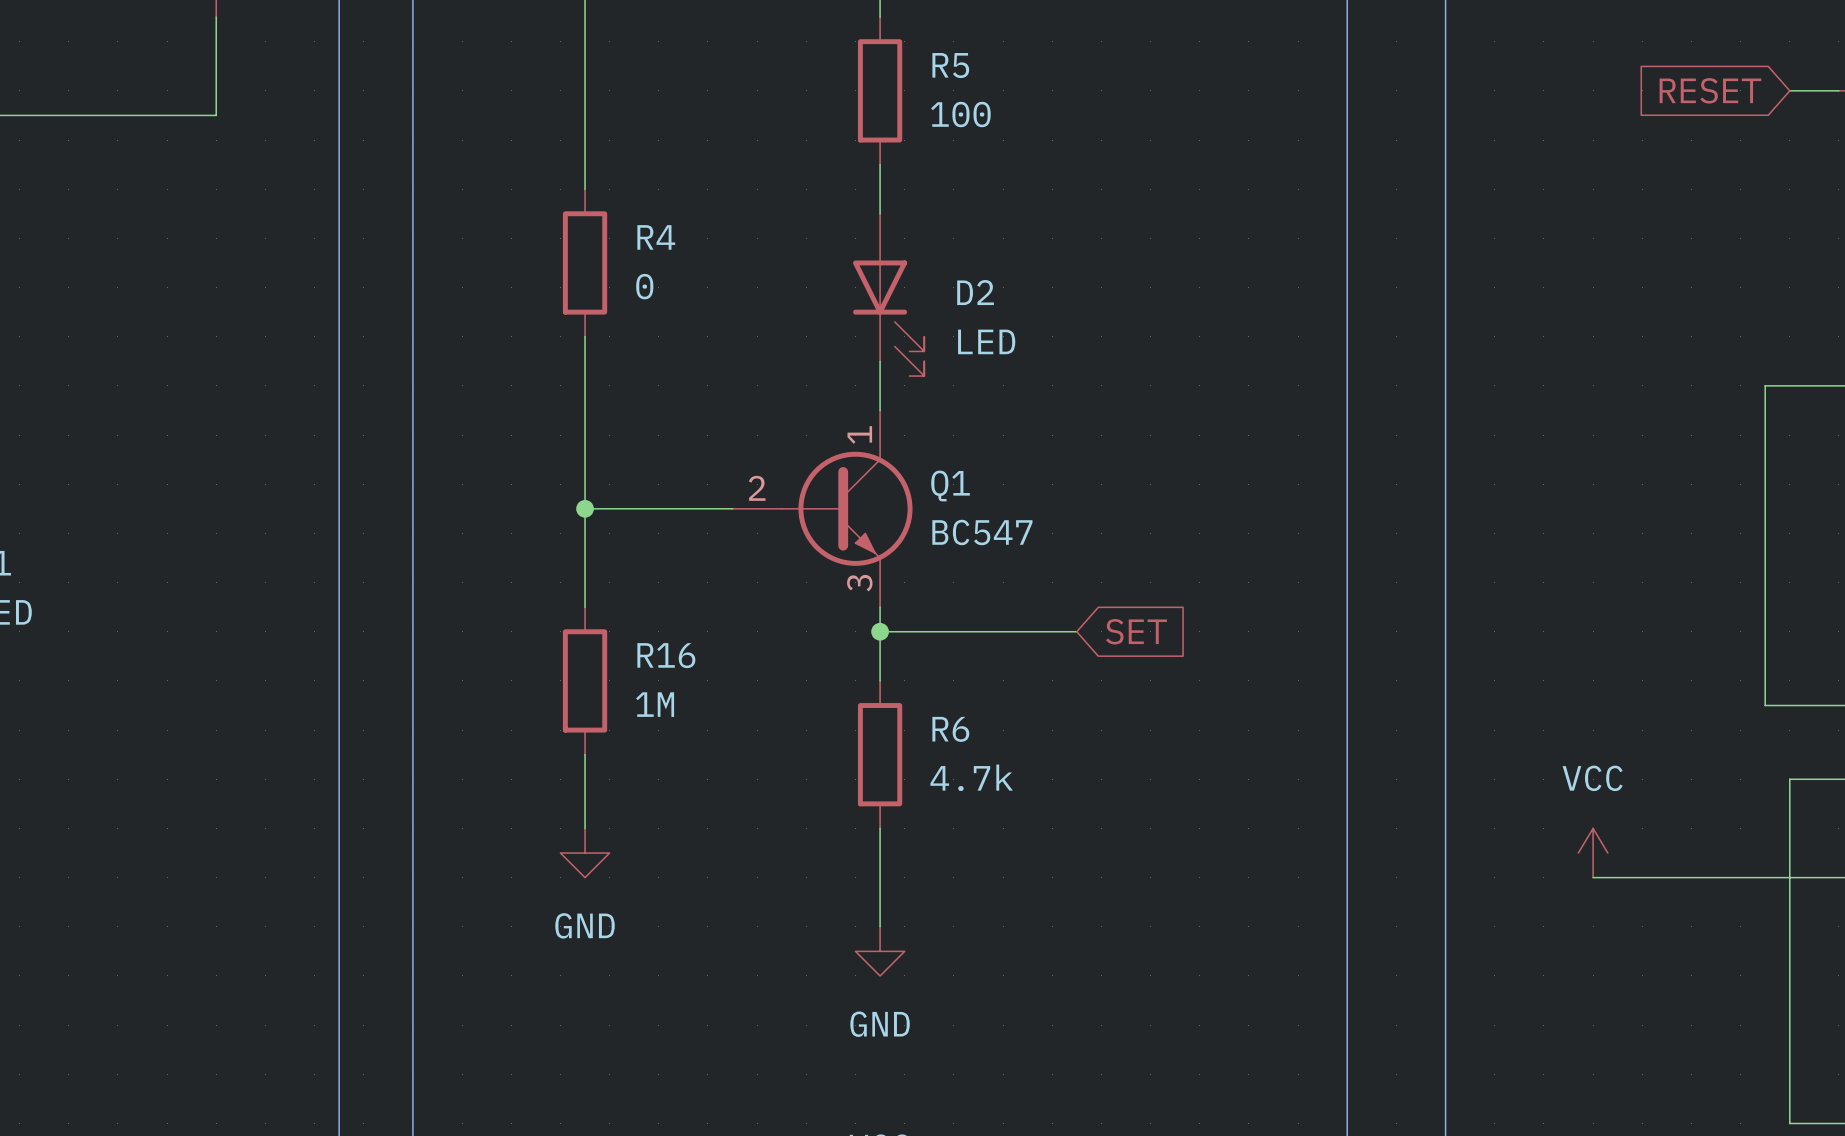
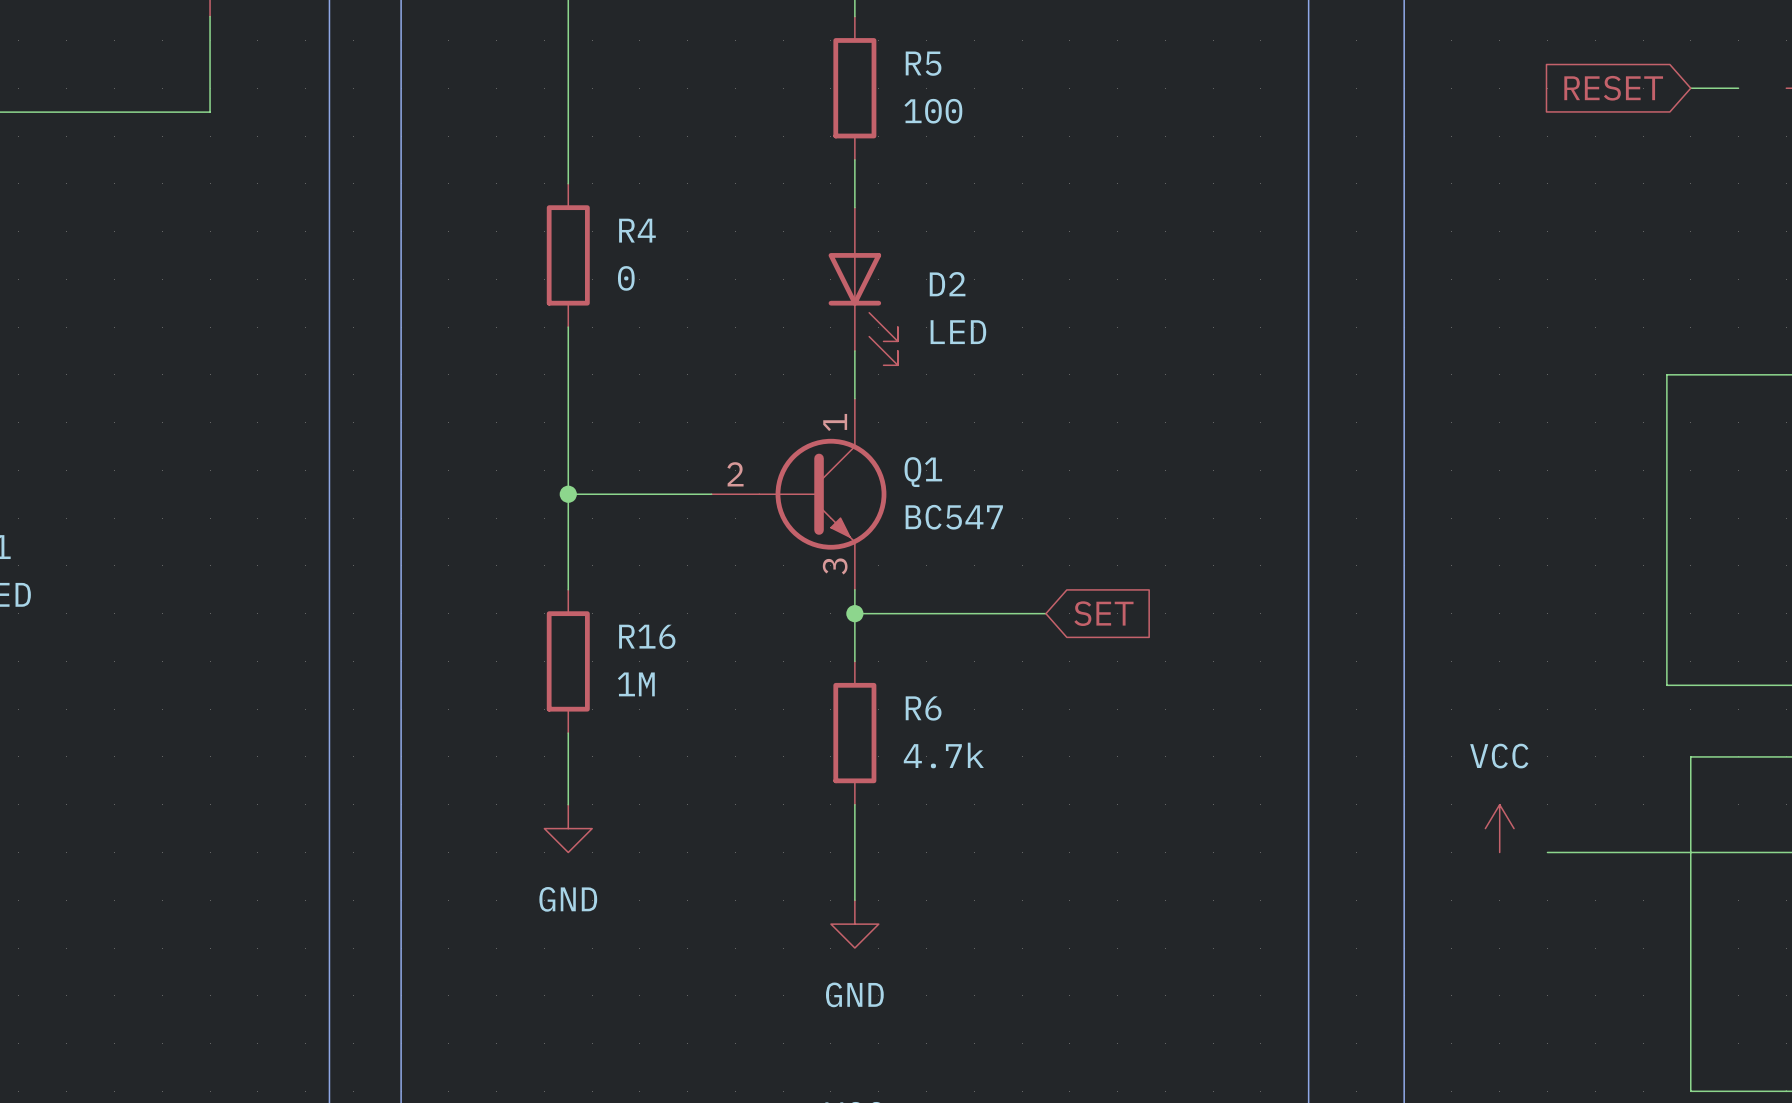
global label position: RESET (1710, 90) -> RESET (1613, 88)
wire: (1789, 90) (1838, 90) -> (1738, 88) (1690, 88)
wire: (1765, 385) (1765, 705) -> (1714, 374) (1666, 374) (1666, 685) (1714, 685)
wire: (1789, 779) (1789, 1123) -> (1738, 756) (1690, 756) (1690, 1091) (1738, 1091)
power symbol position: VCC (1593, 853) -> VCC (1499, 828)

